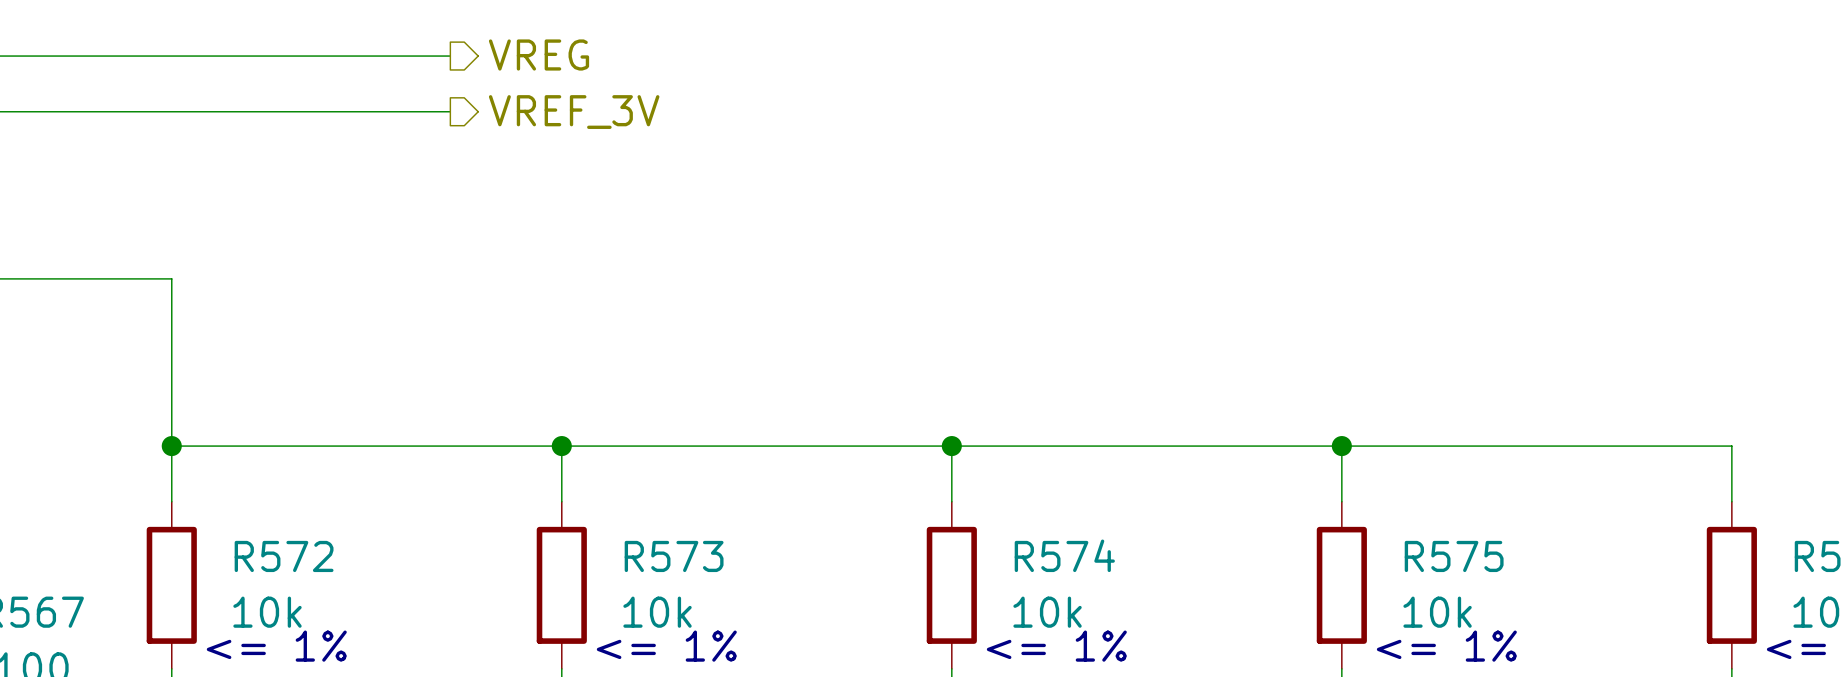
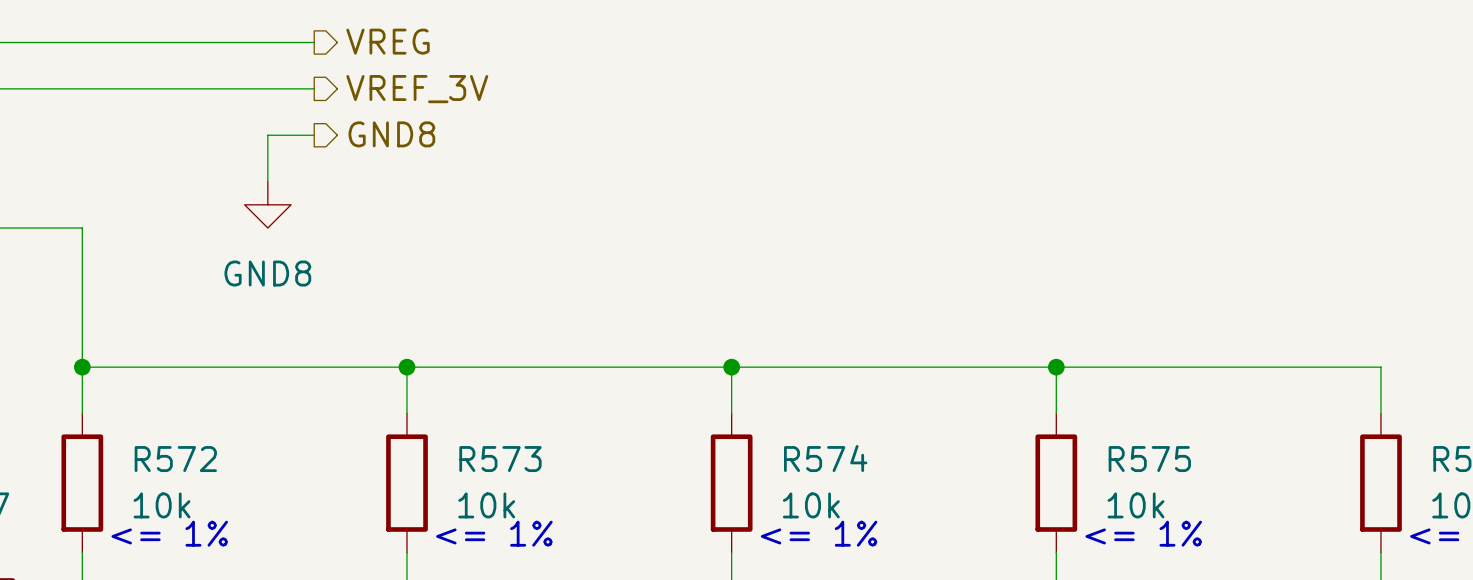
hierarchical label: none -> GND8 (391, 134)
wire: none -> (314, 135) (267, 135) (267, 181)
power symbol: none -> GND8 (267, 204)

